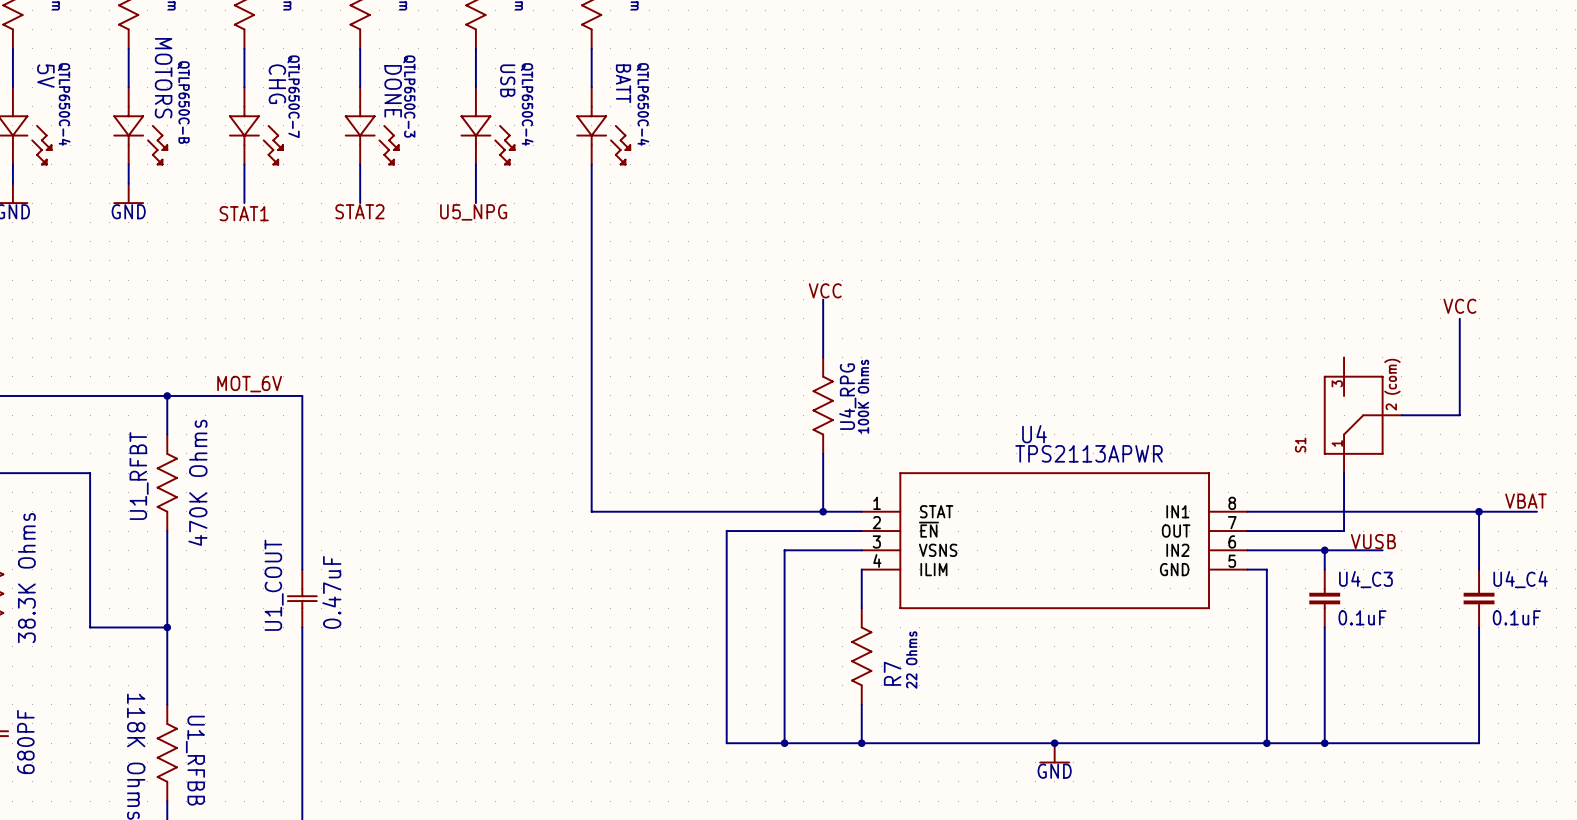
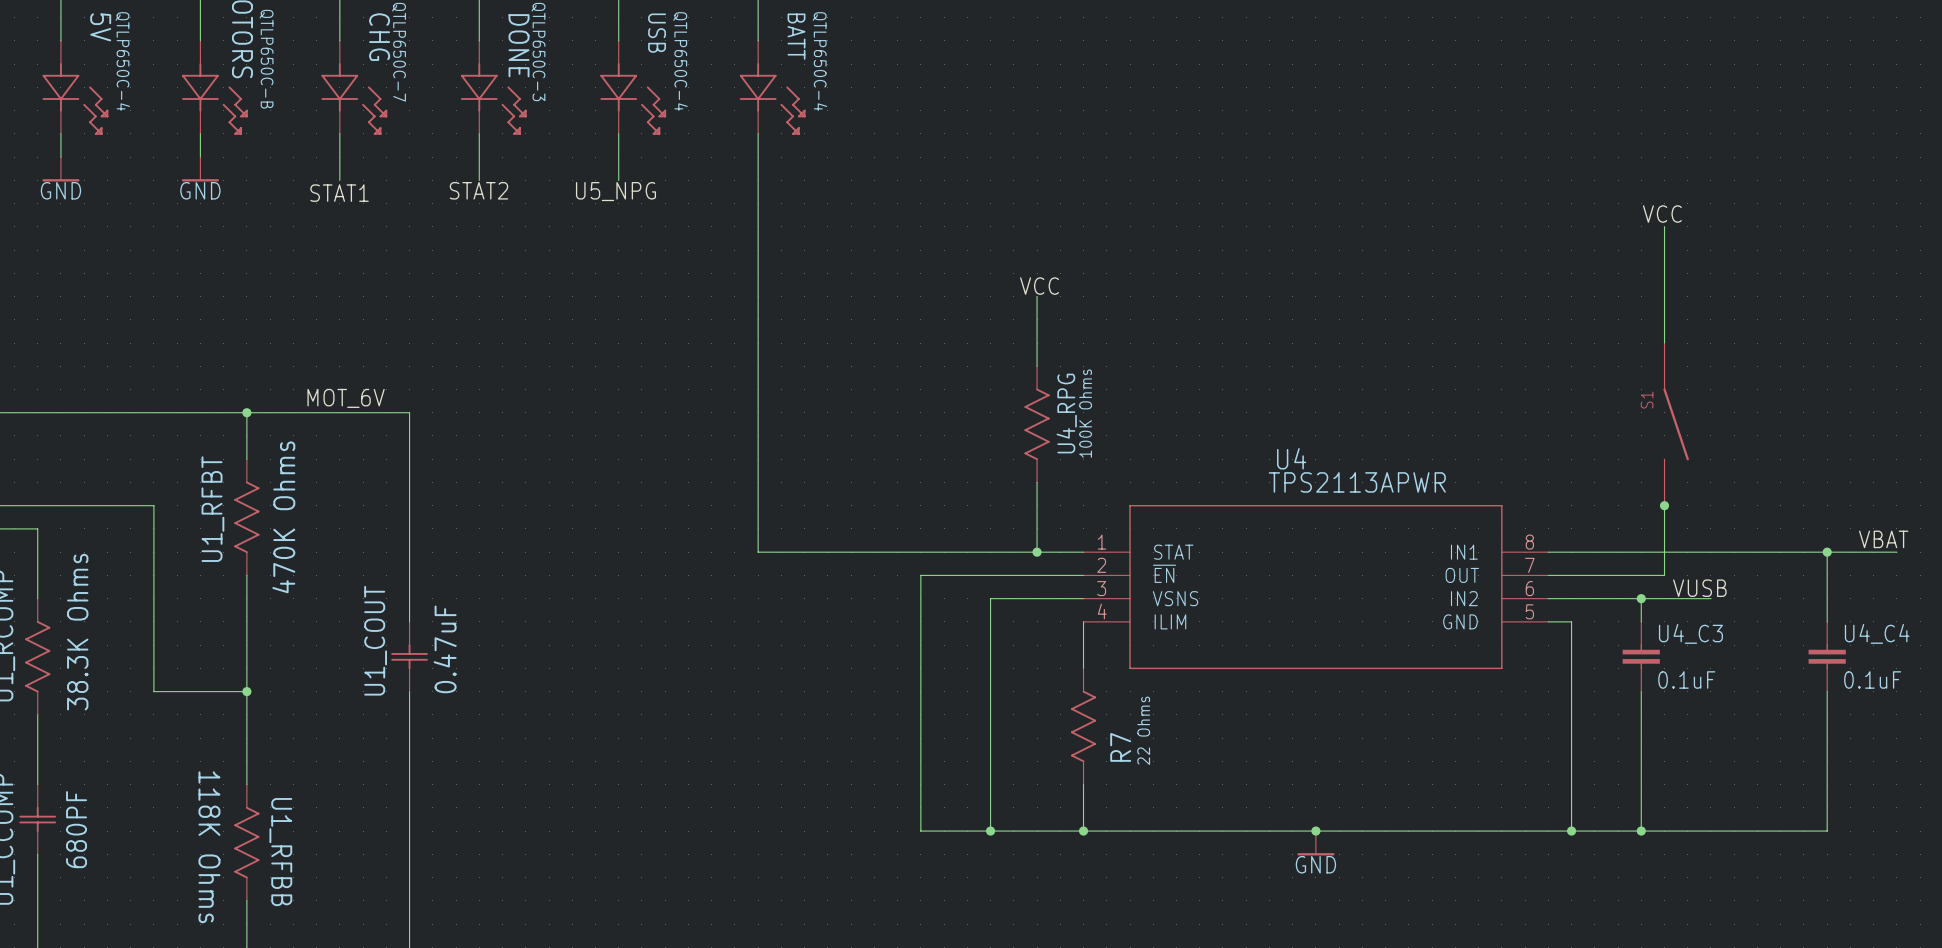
wire: none -> (1664, 226) (1664, 343)
label position: VCC (1459, 306) -> VCC (1662, 214)
wire: (1459, 318) (1459, 415) (1401, 415) -> none
S1 symbol: [1323, 357, 1402, 474] -> [1663, 343, 1689, 506]
S1 name position: S1 (1300, 445) -> S1 (1647, 400)
junction: none -> (1664, 505)

